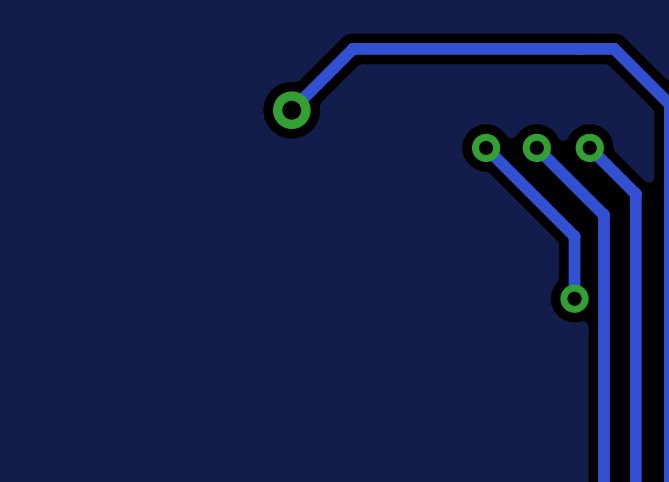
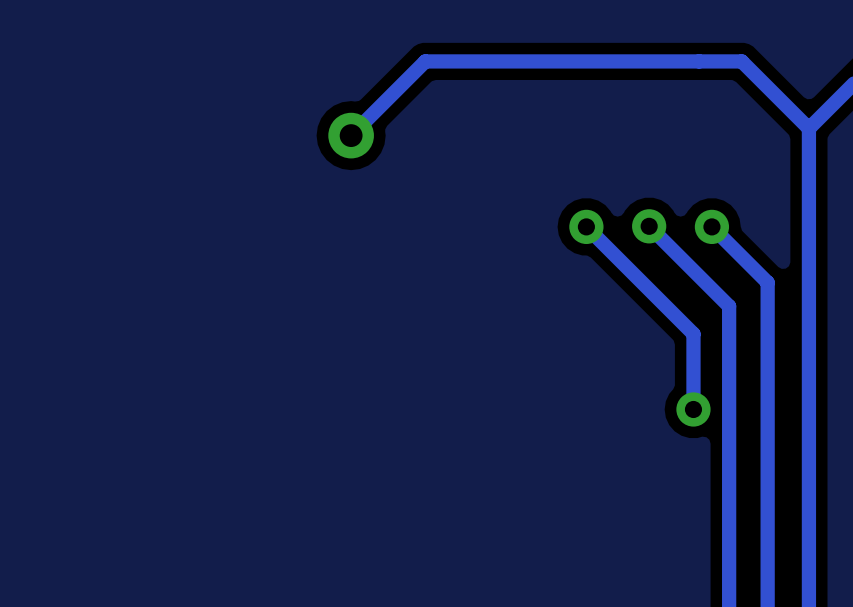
track: (486, 147) (574, 236) (574, 274) -> (586, 226) (693, 333)
via: (486, 147) -> none
track: (536, 147) (603, 215) (603, 251) -> (649, 226) (729, 306)
via: (536, 147) -> none
track: (589, 147) (635, 193) (635, 231) -> (711, 226) (767, 282)
via: (589, 147) -> none
via: none -> (586, 226)
via: none -> (649, 226)
via: none -> (711, 226)
track: none -> (693, 363) (693, 409)
via position: (574, 298) -> (693, 409)

